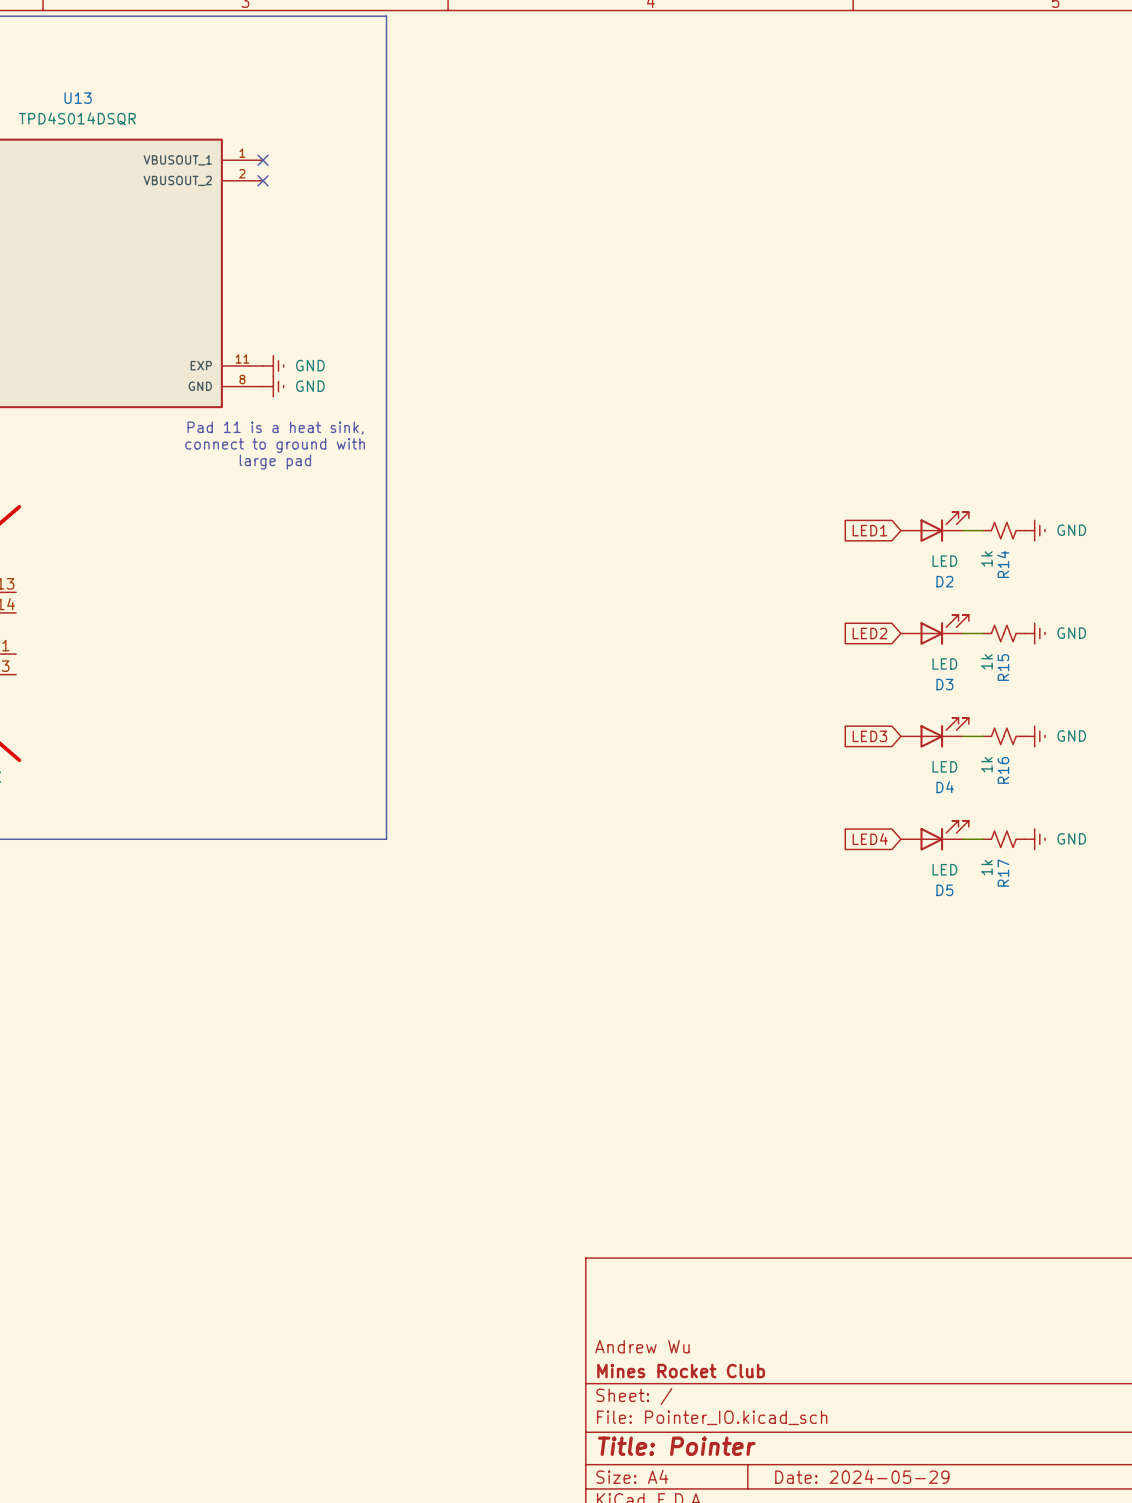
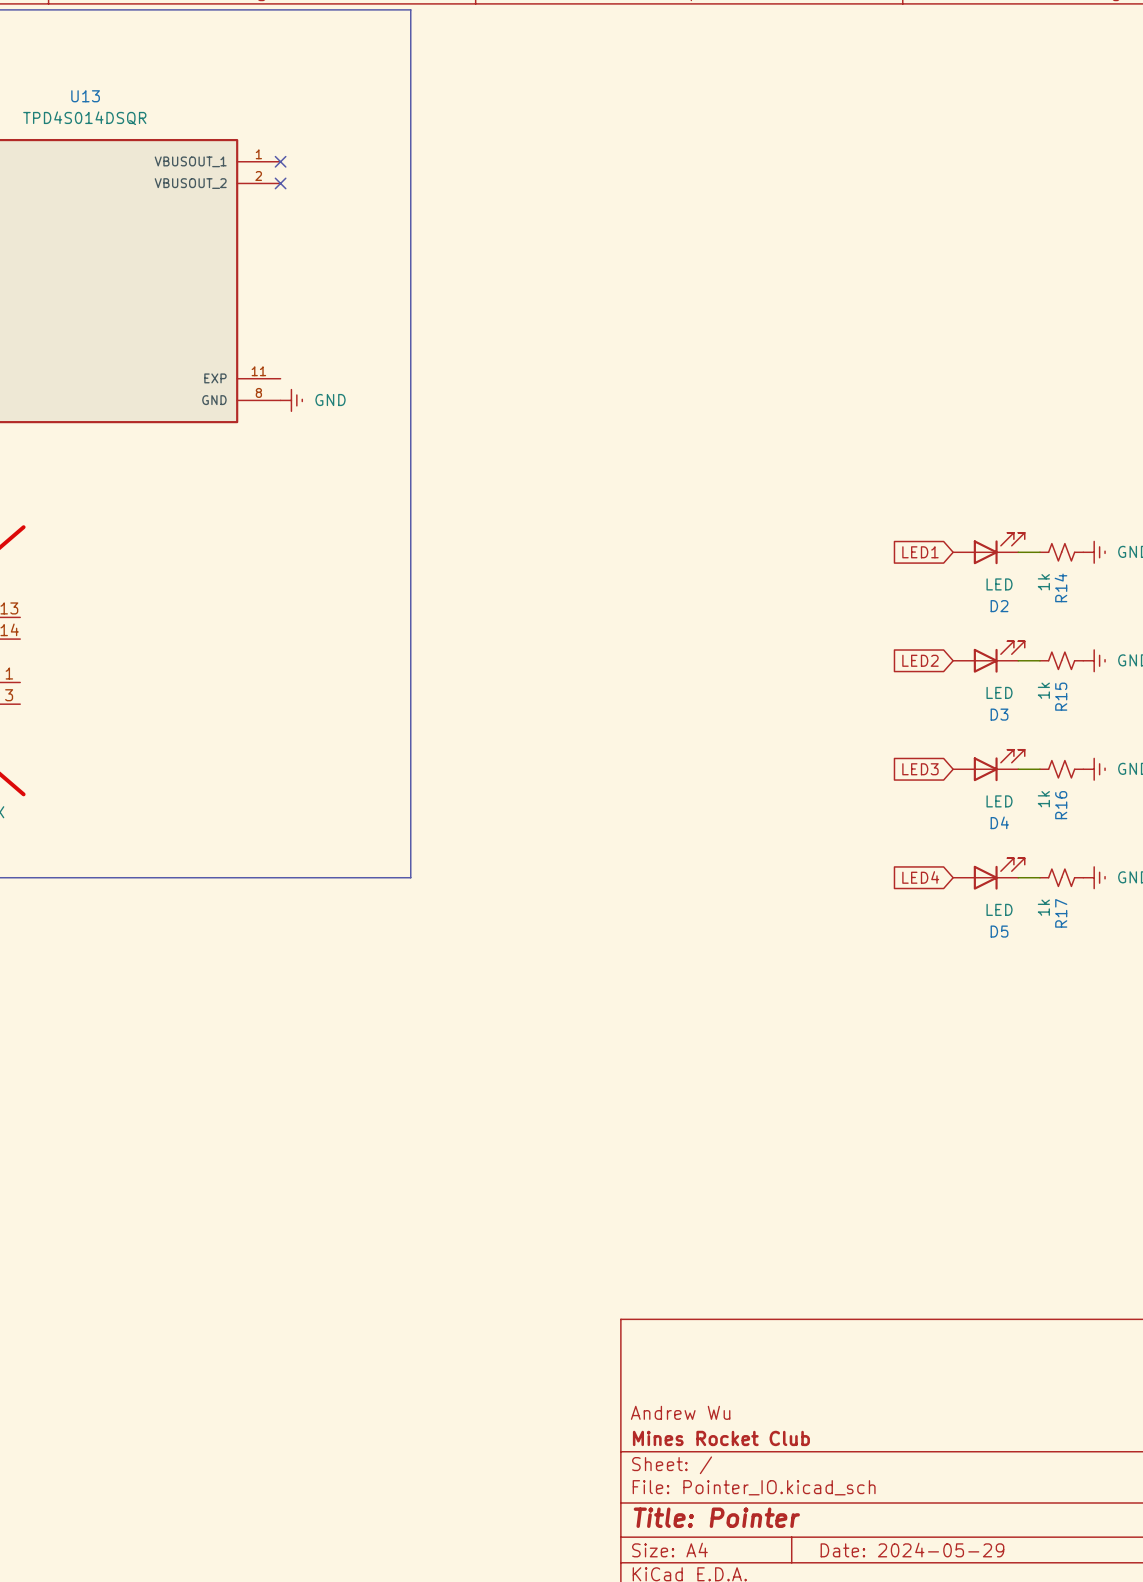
power symbol: GND (273, 366) -> none
text: Pad 11 is a heat sink, (275, 428) -> none
text: connect to ground with (275, 445) -> none
text: large pad (275, 462) -> none

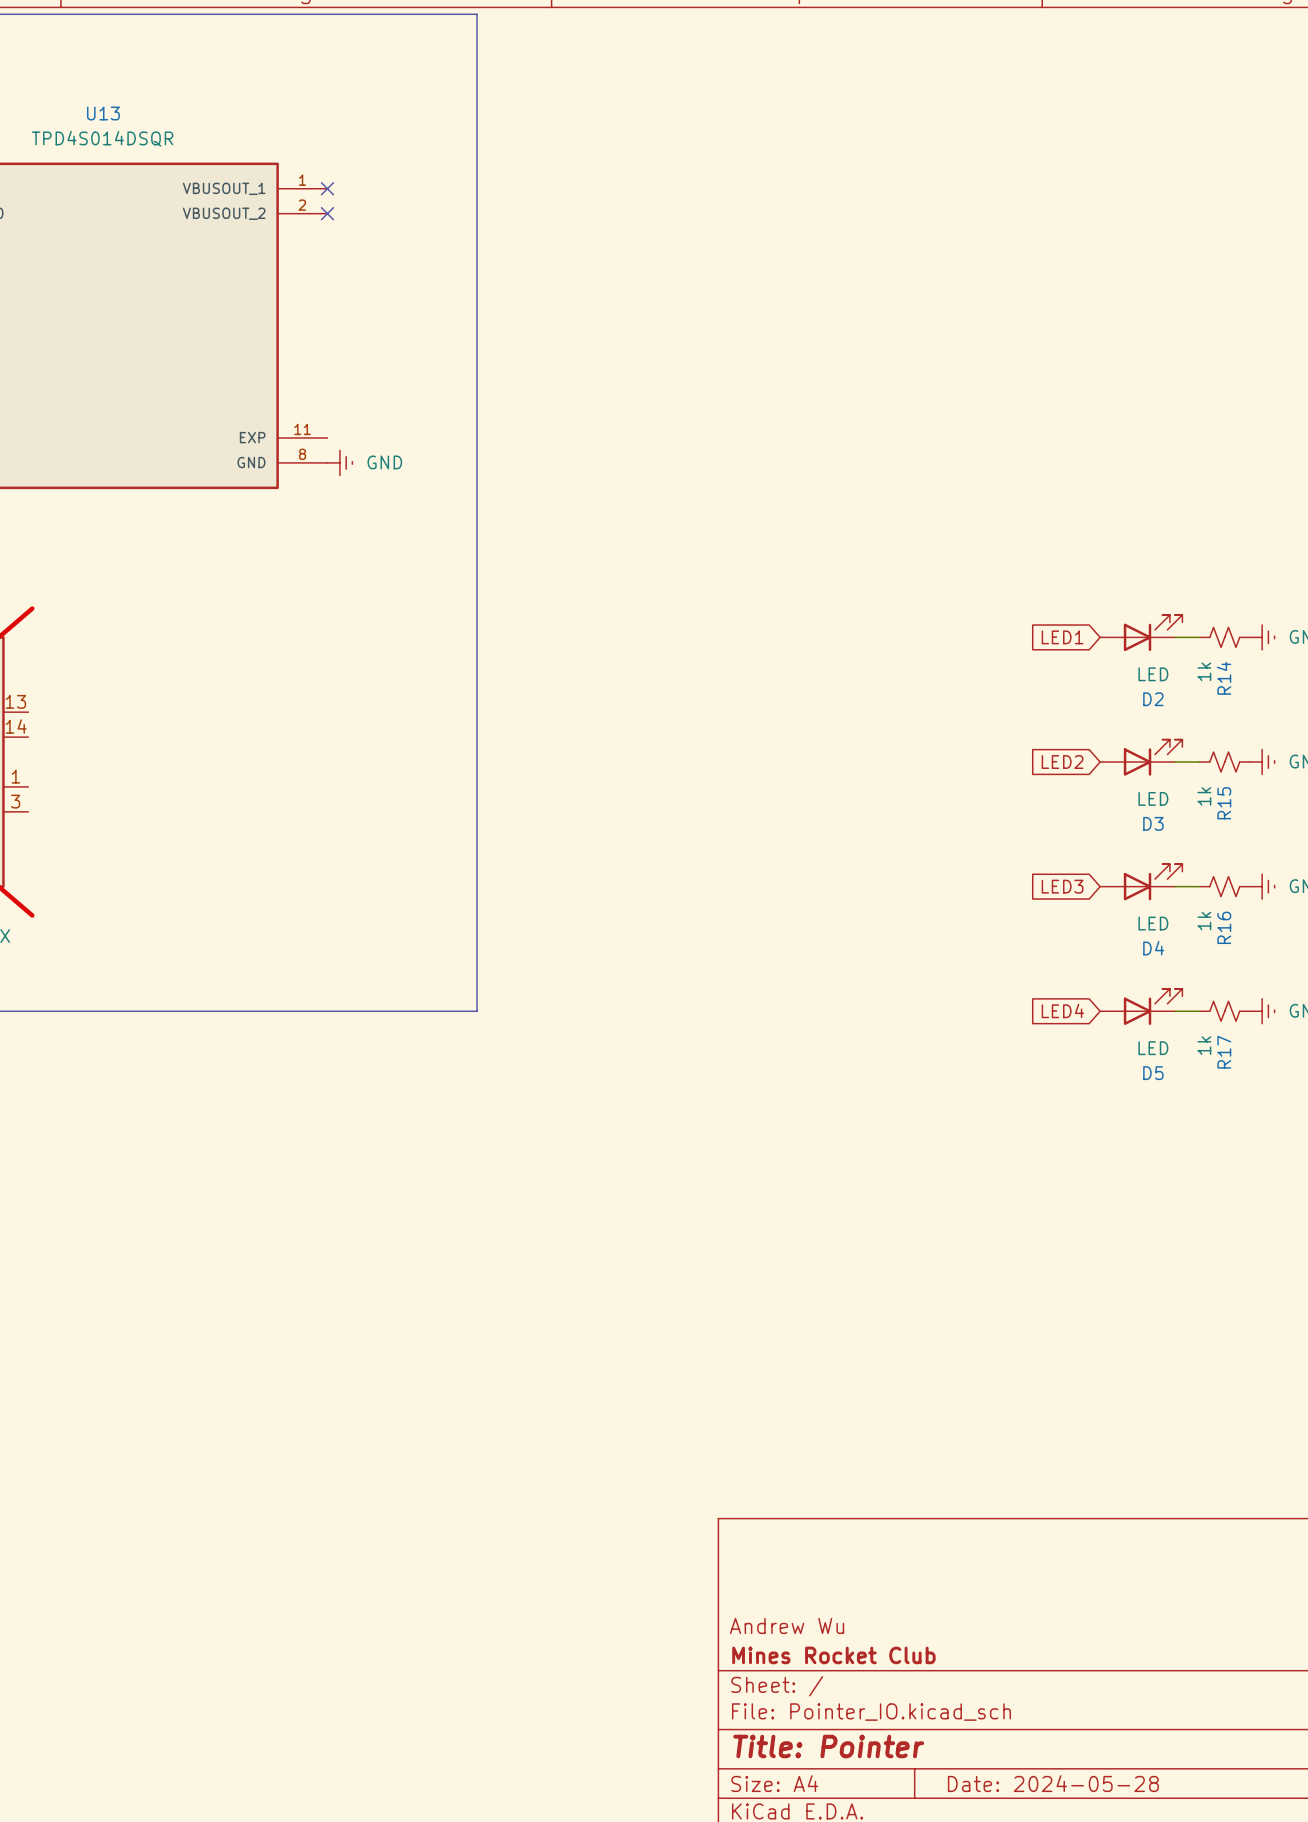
title block: Date: 2024-05-29 (912, 1550) -> Date: 2024-05-28 (1053, 1783)

